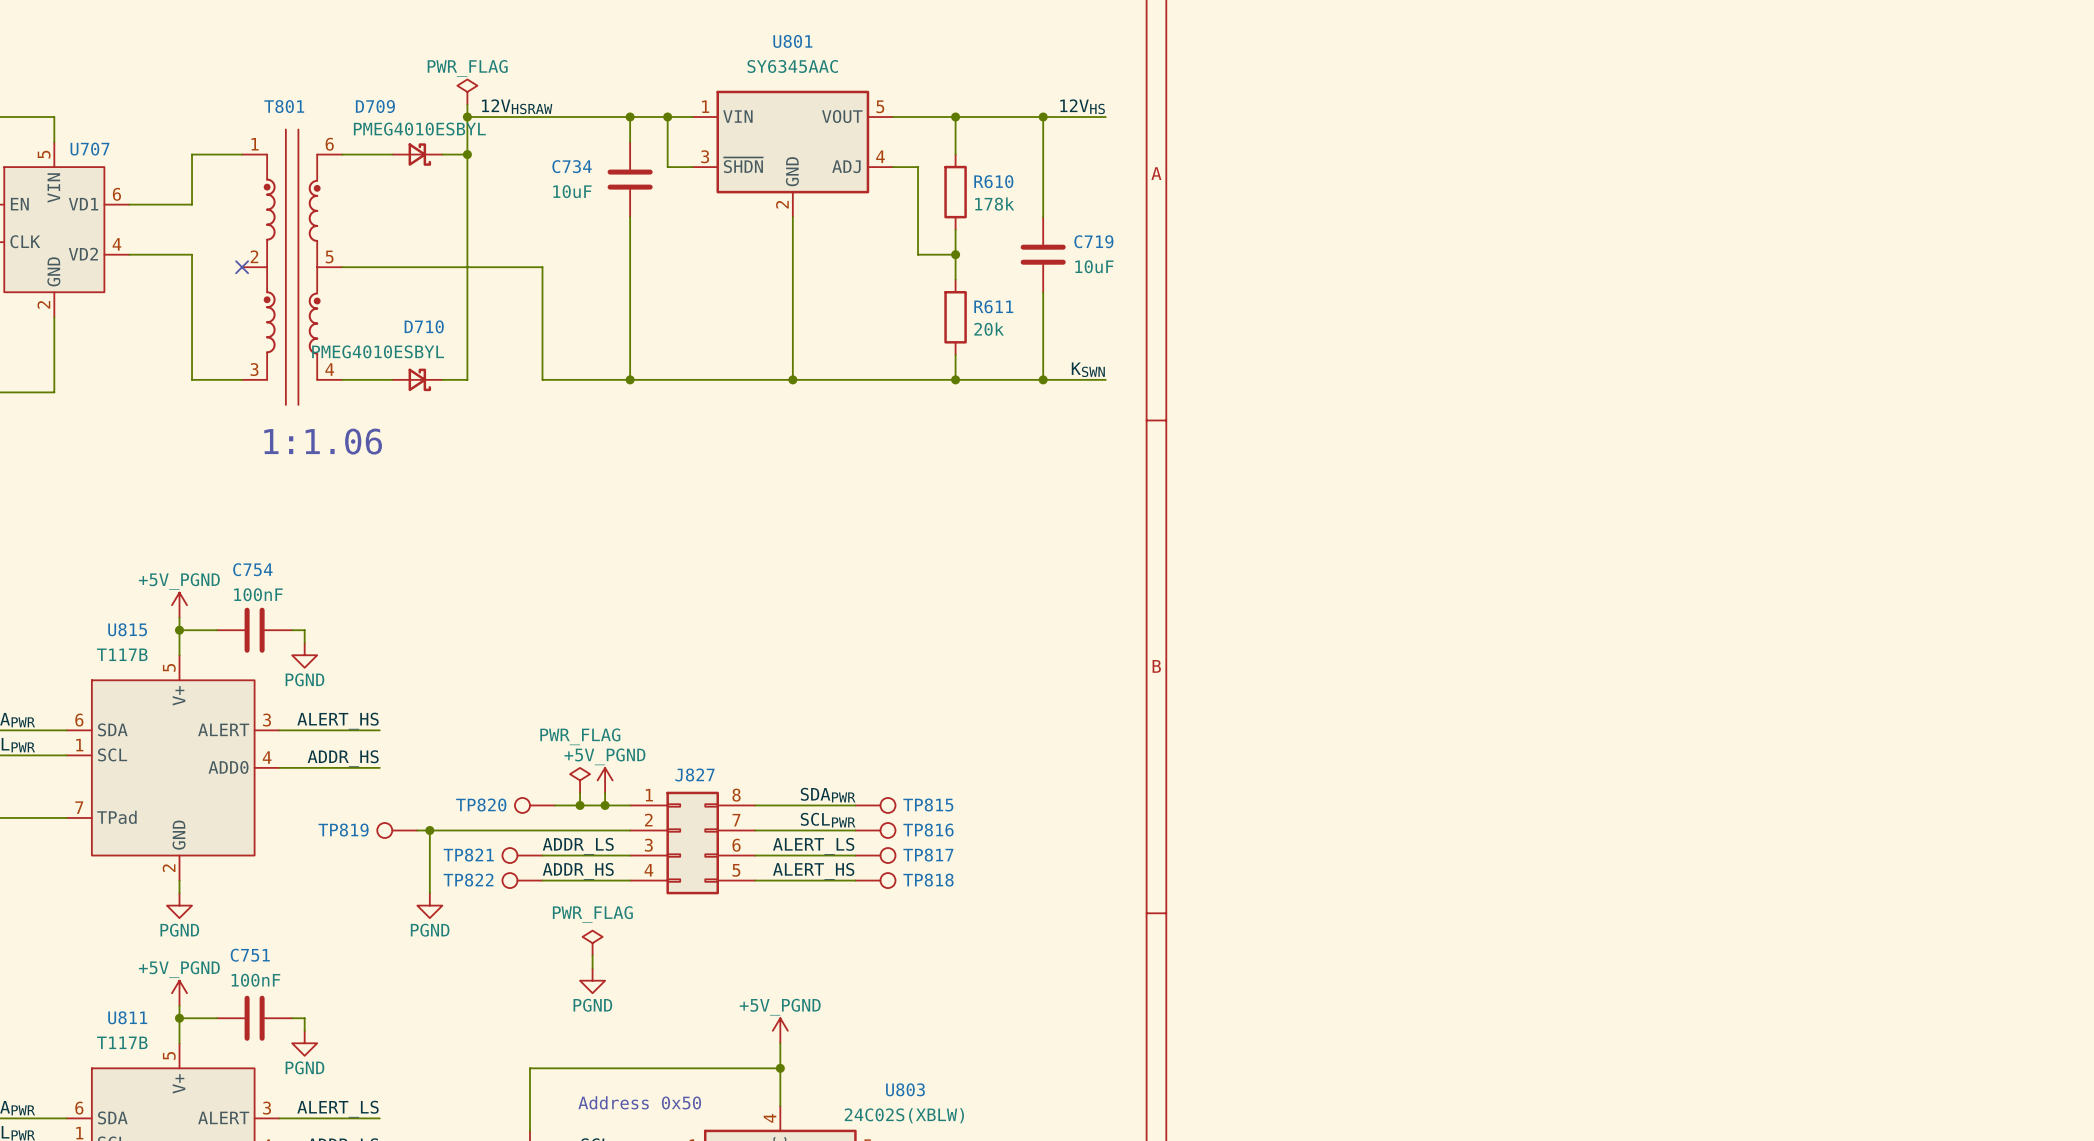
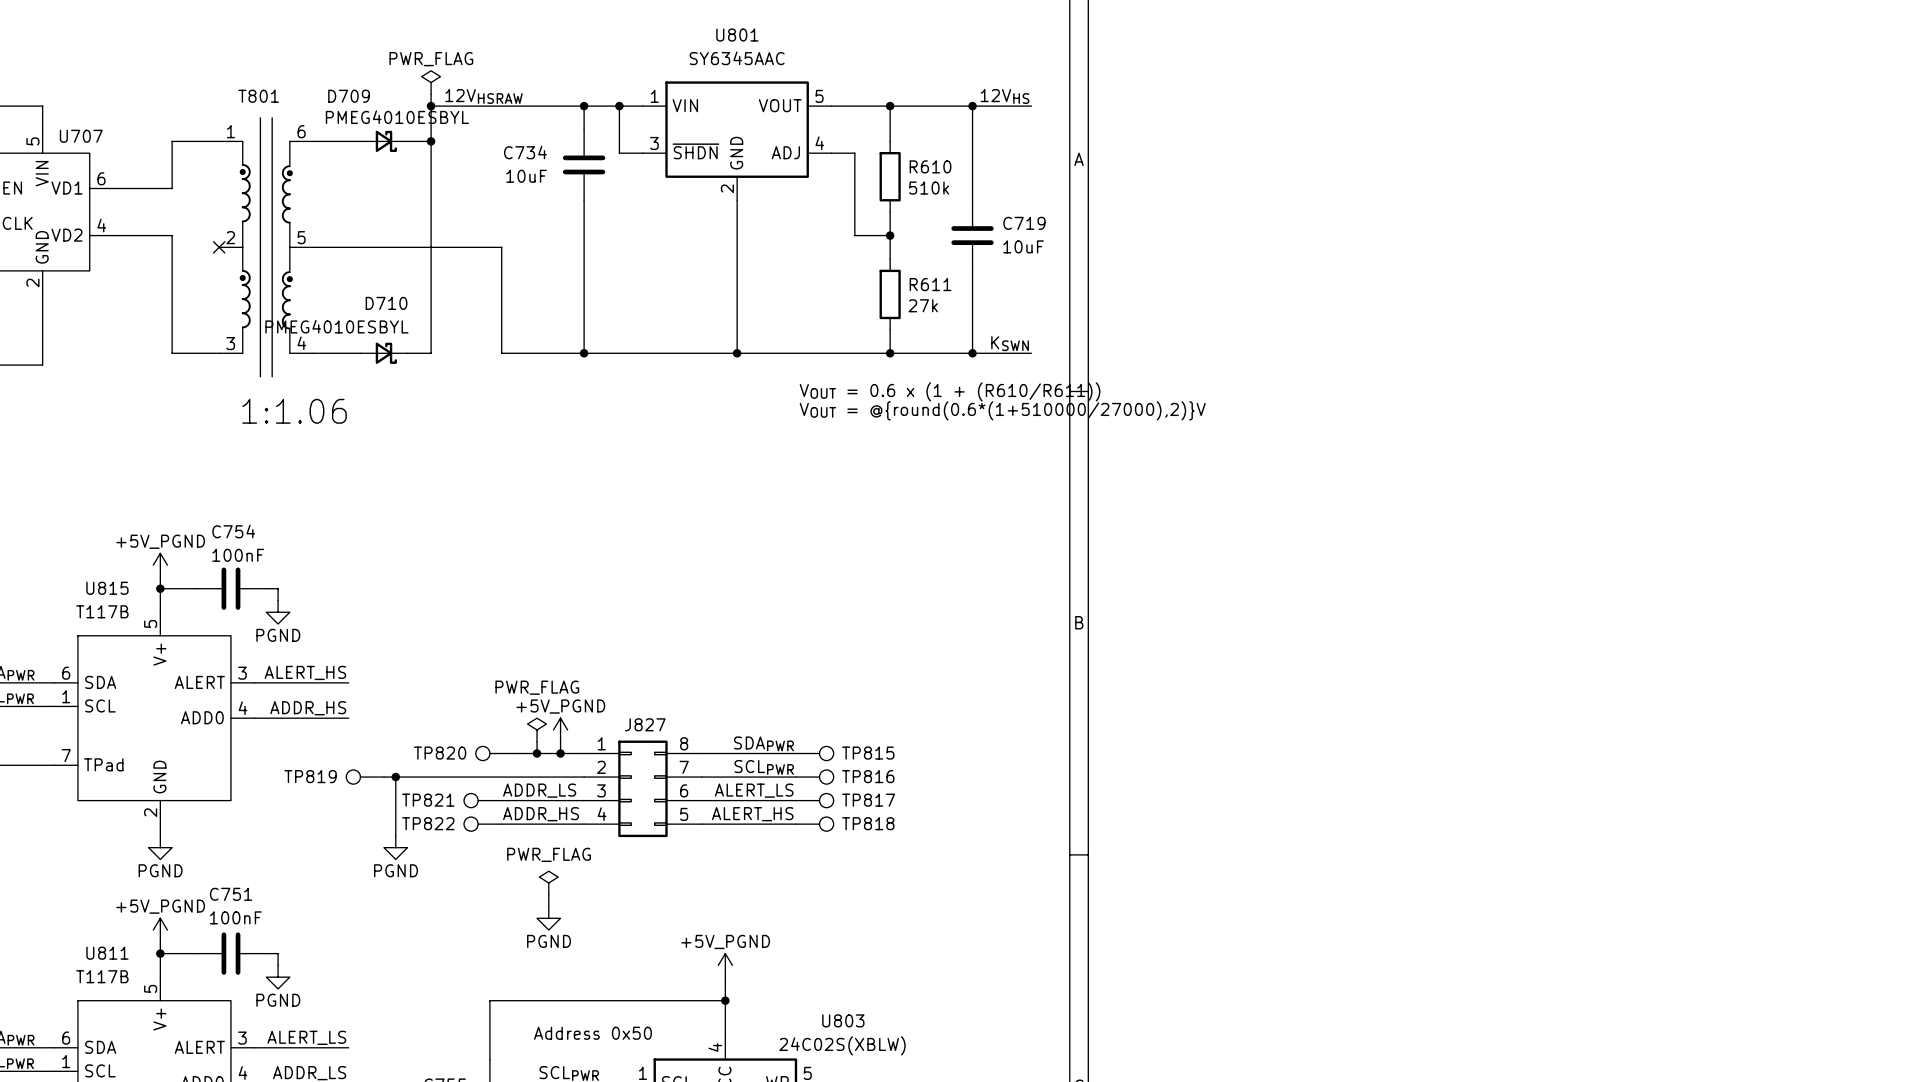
R610 value: 178k (994, 204) -> 510k (929, 188)
R611 value: 20k (989, 329) -> 27k (923, 305)
text: none -> VOUT = 0.6 x (1 + (R610/R611)) (950, 391)
text: none -> VOUT = @{round(0.6*(1+510000/27000),2)}V (1002, 410)

